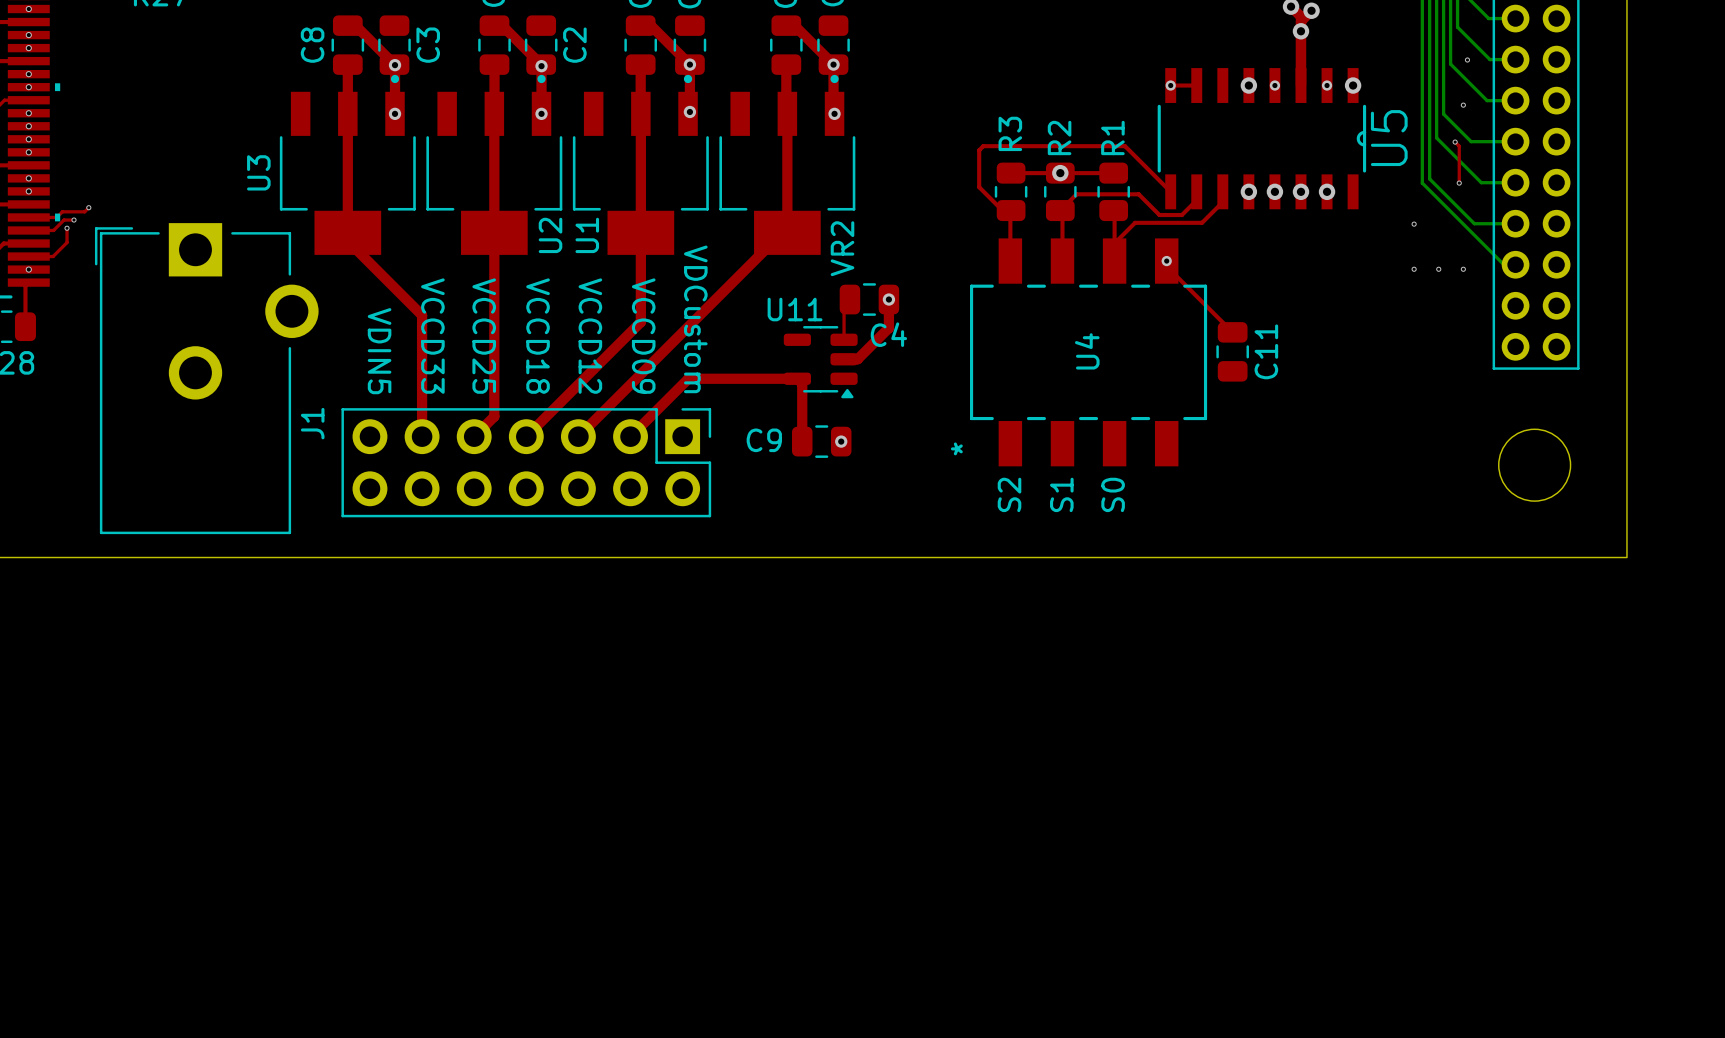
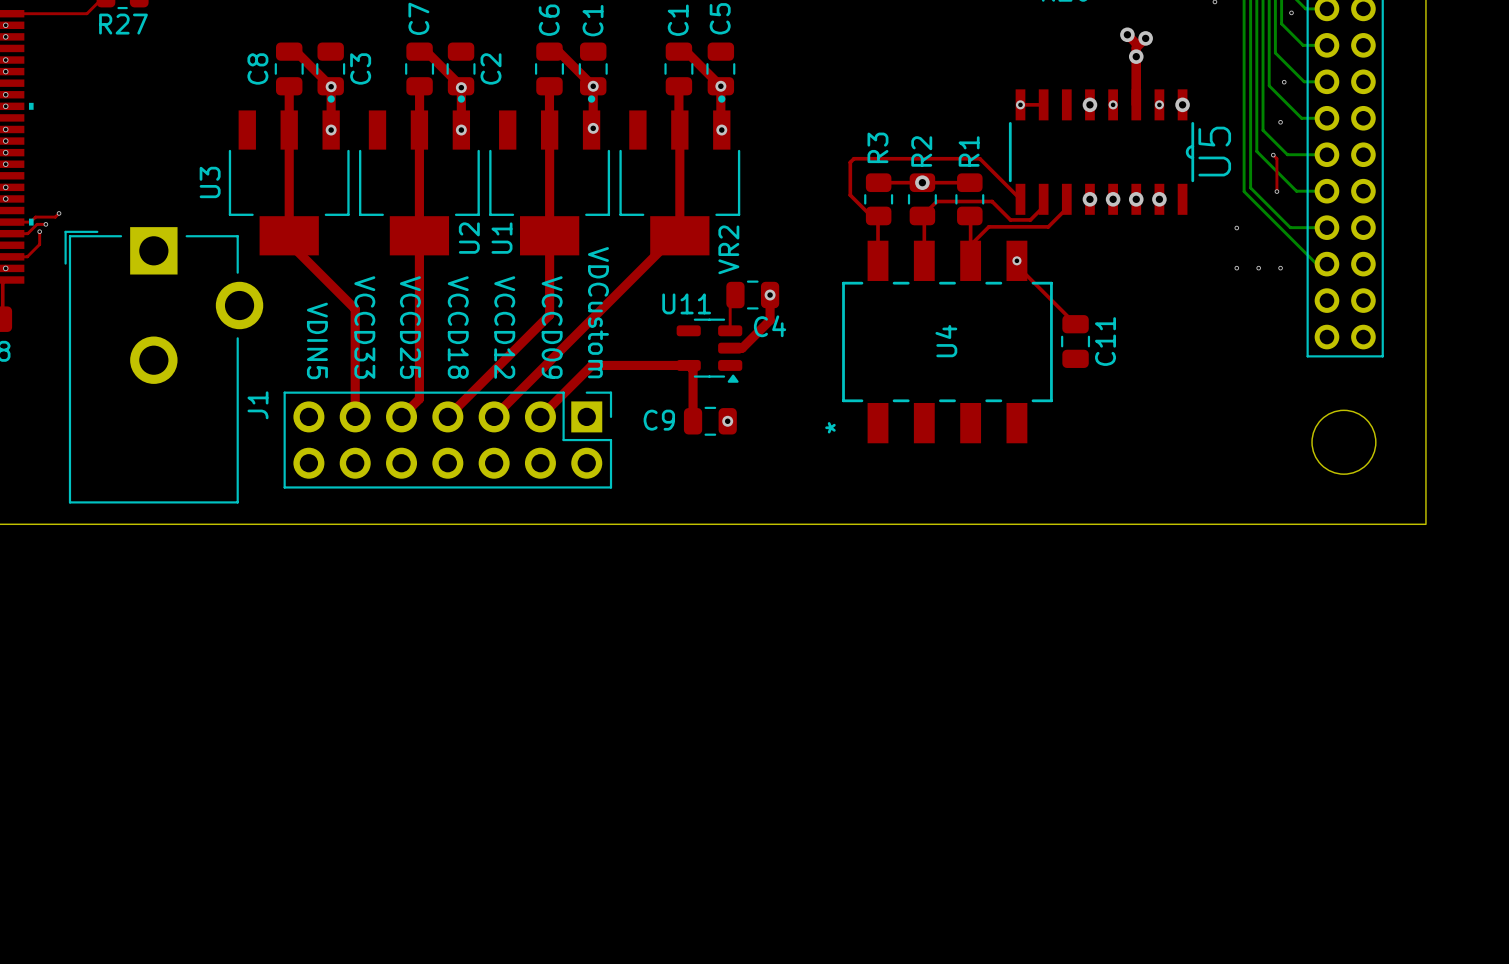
text: S2 (1009, 494) -> none
text: S1 (1061, 494) -> none
text: S0 (1113, 494) -> none

